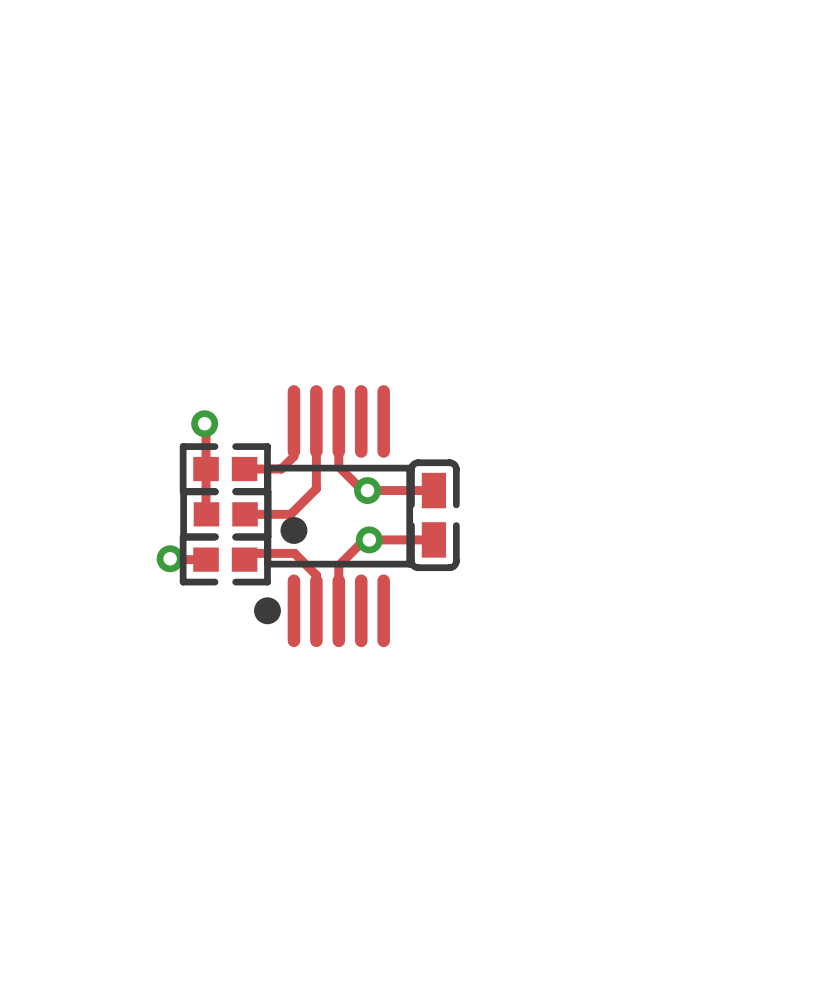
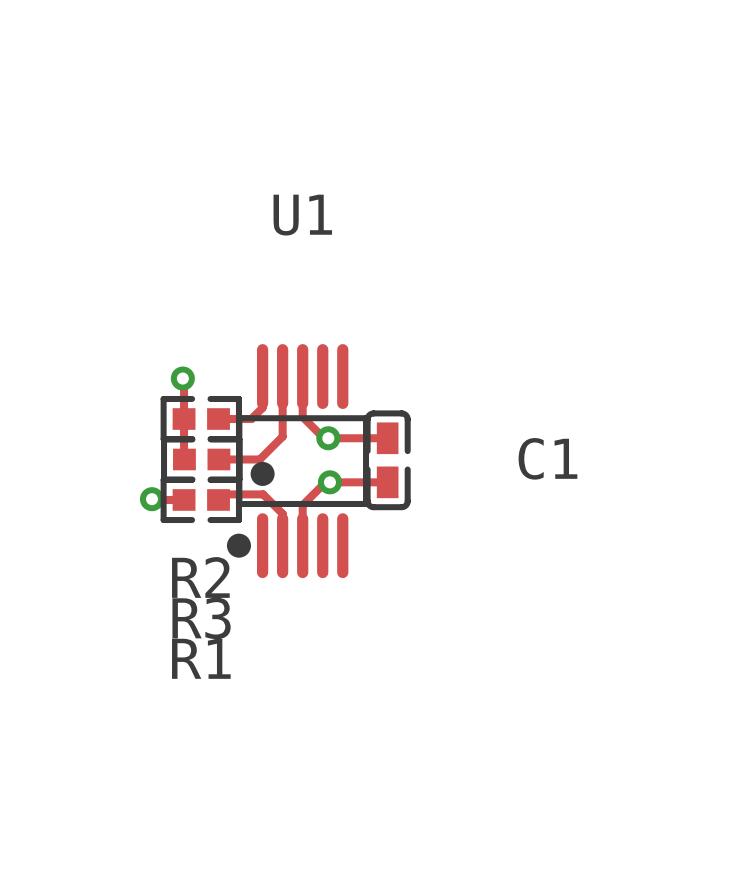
U1 name: none -> U1 (302, 215)
C1 name: none -> C1 (547, 458)
R2 name: none -> R2 (200, 577)
R3 name: none -> R3 (201, 618)
R1 name: none -> R1 (201, 658)

